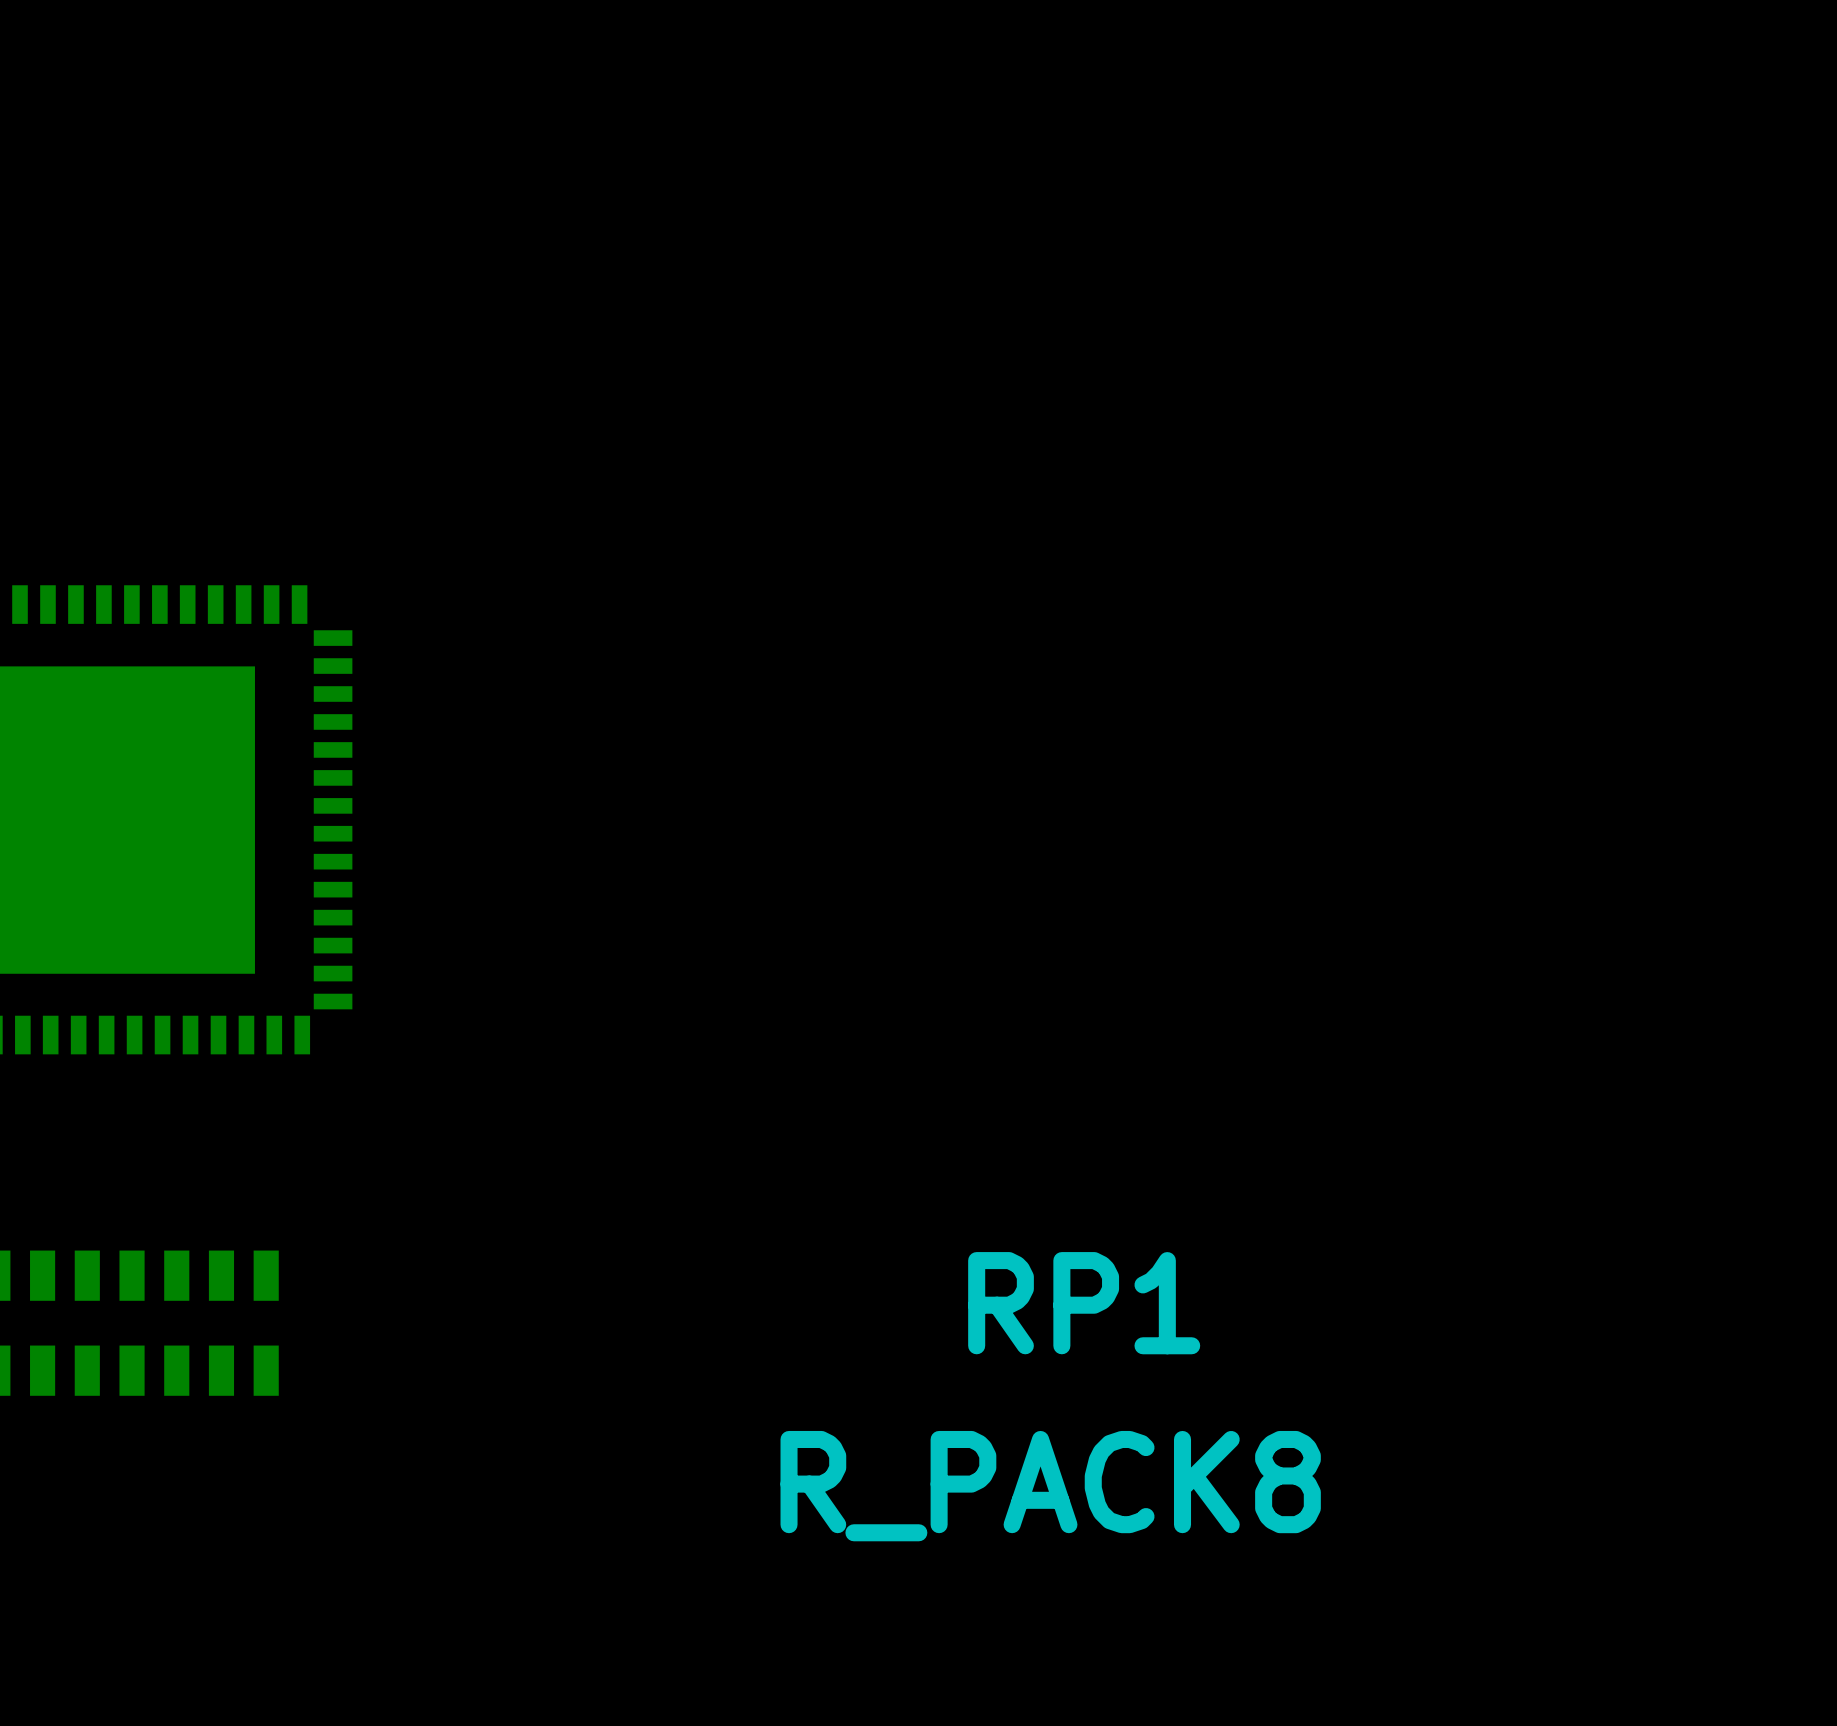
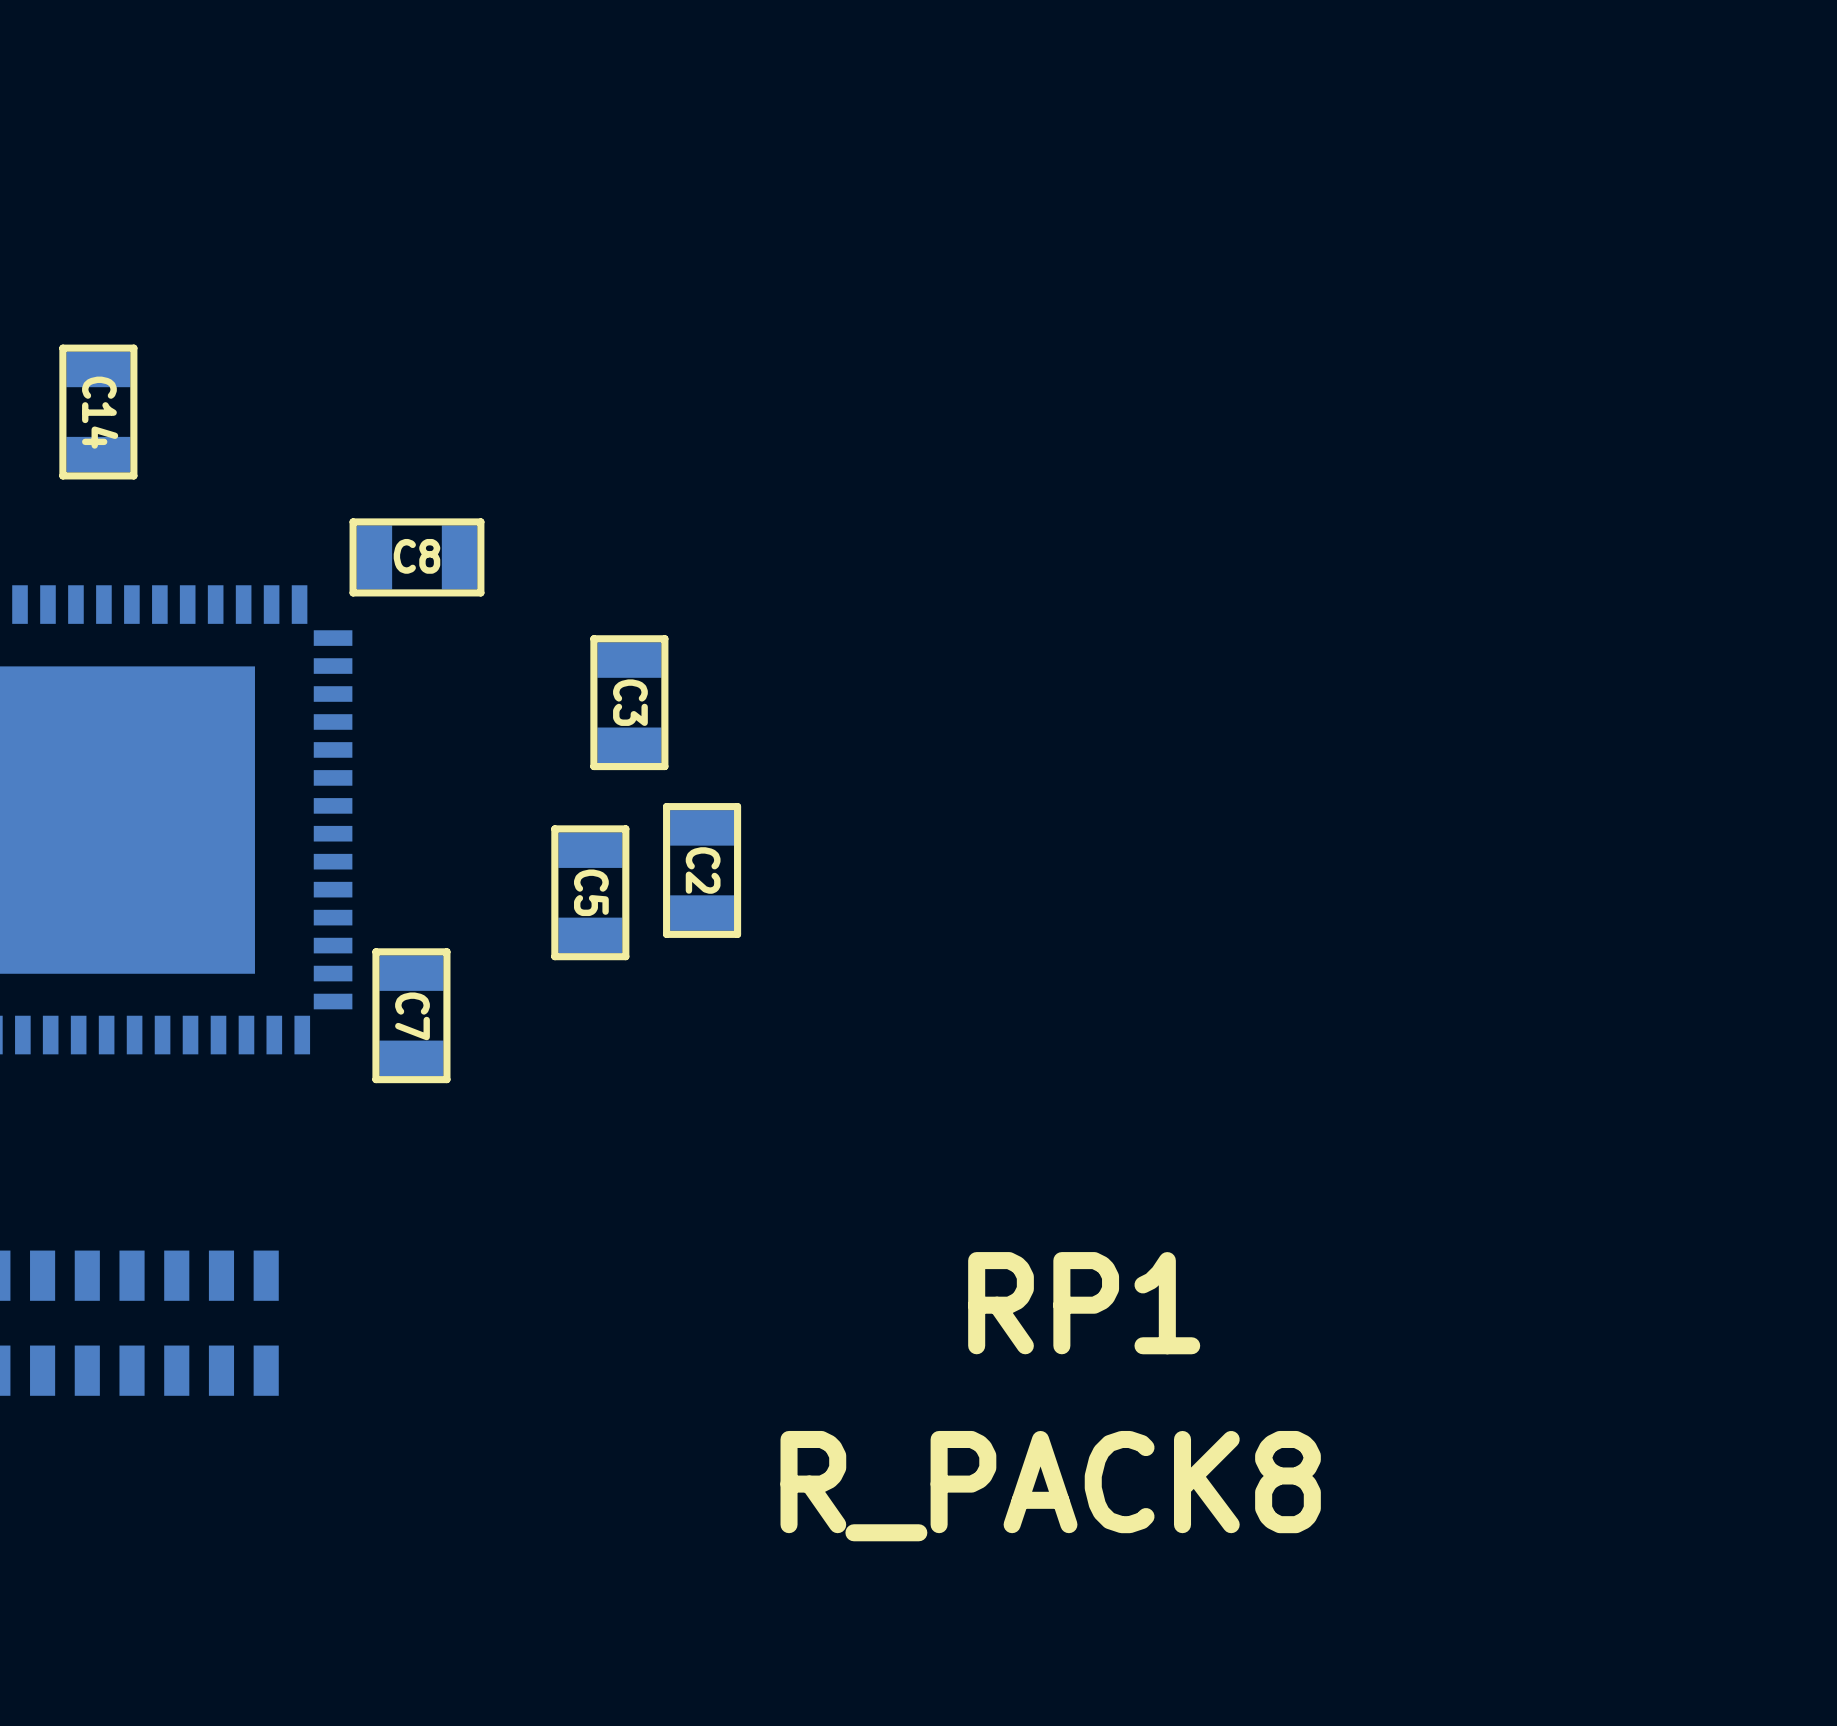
C14: none -> (98, 412)
C8: none -> (416, 557)
C3: none -> (629, 702)
C2: none -> (702, 870)
C5: none -> (590, 892)
C7: none -> (411, 1015)

